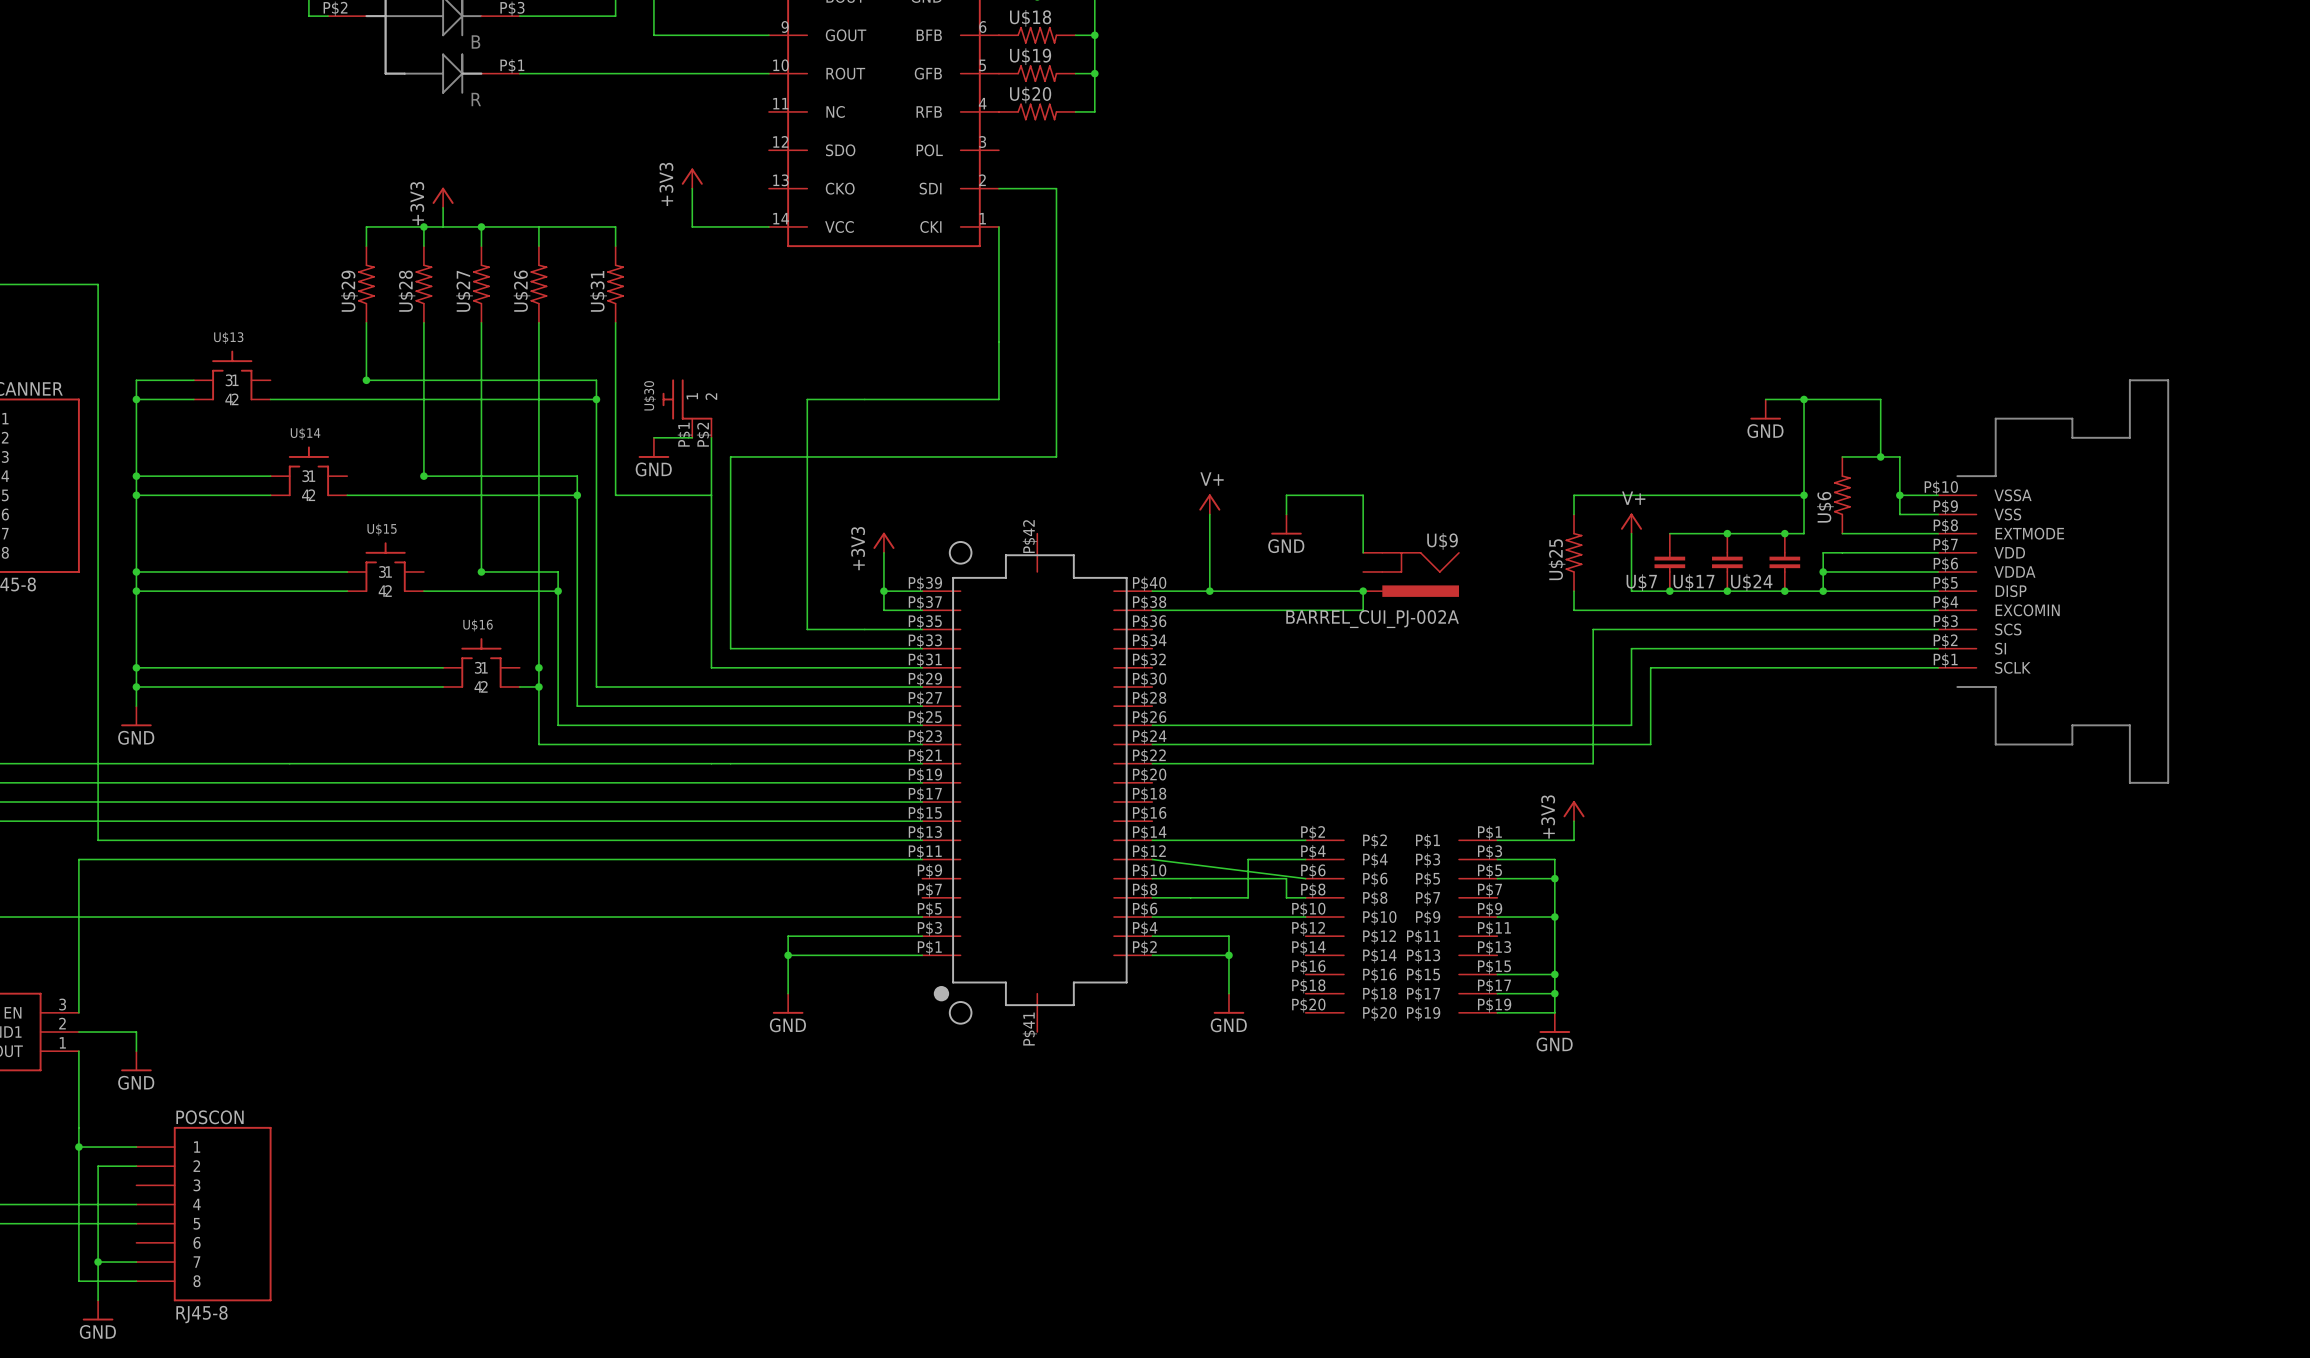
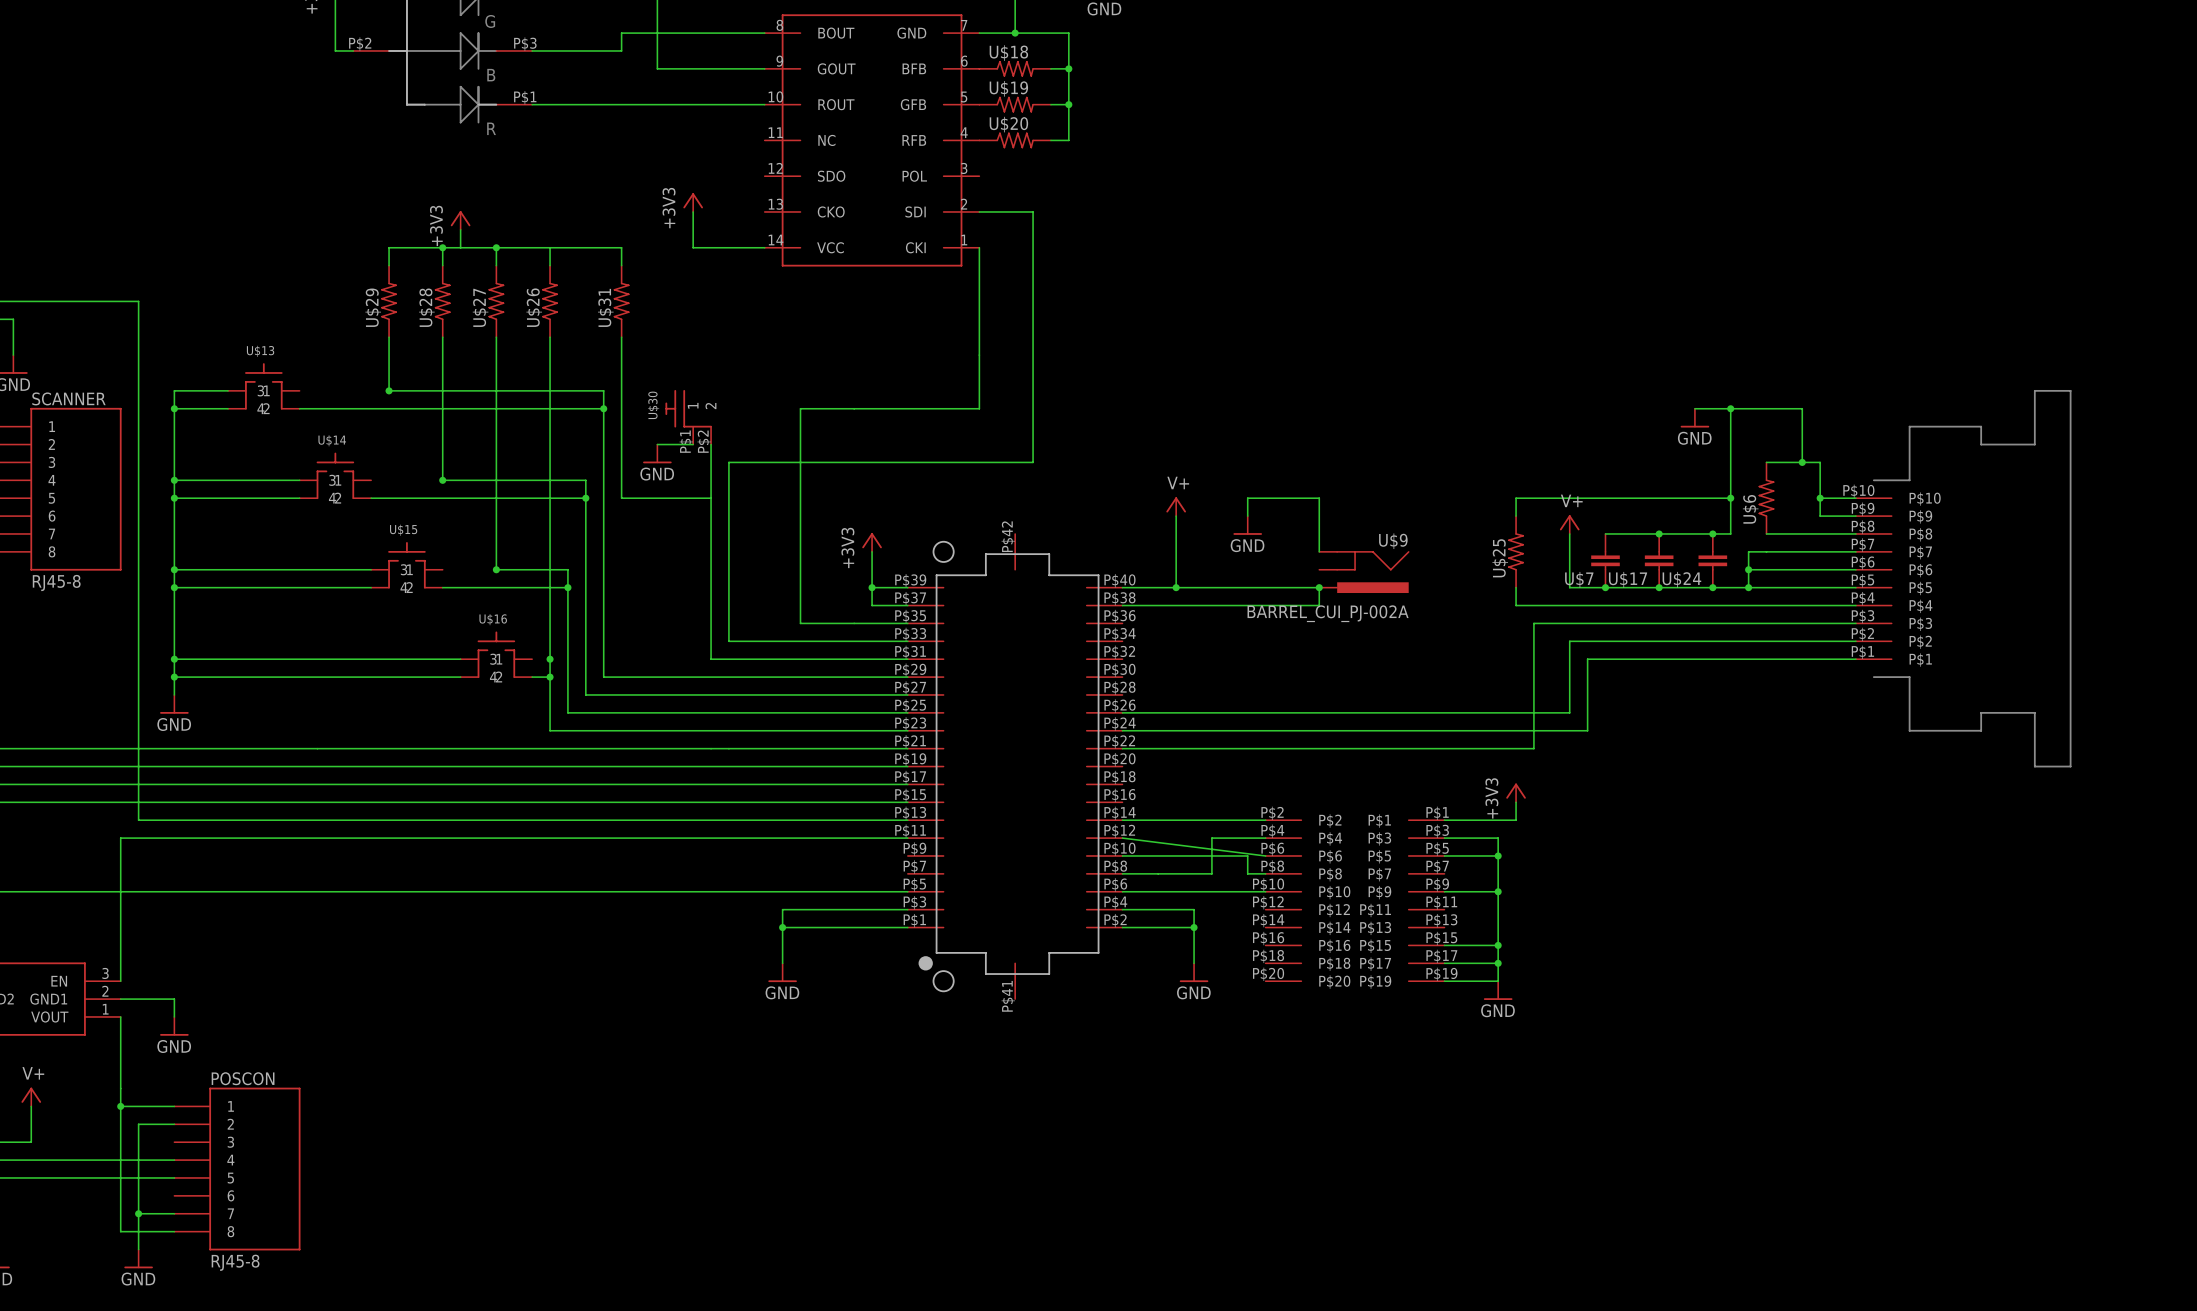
part symbol: [1938, 379, 2170, 784] -> [1855, 389, 2072, 768]

